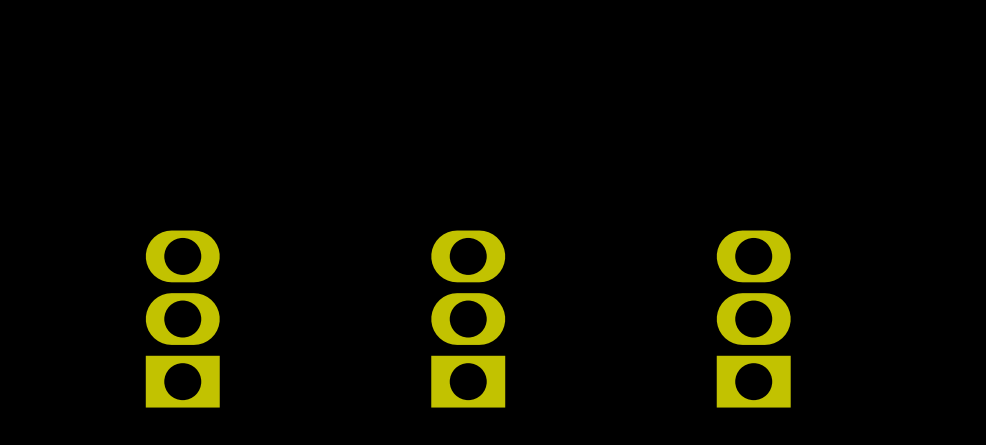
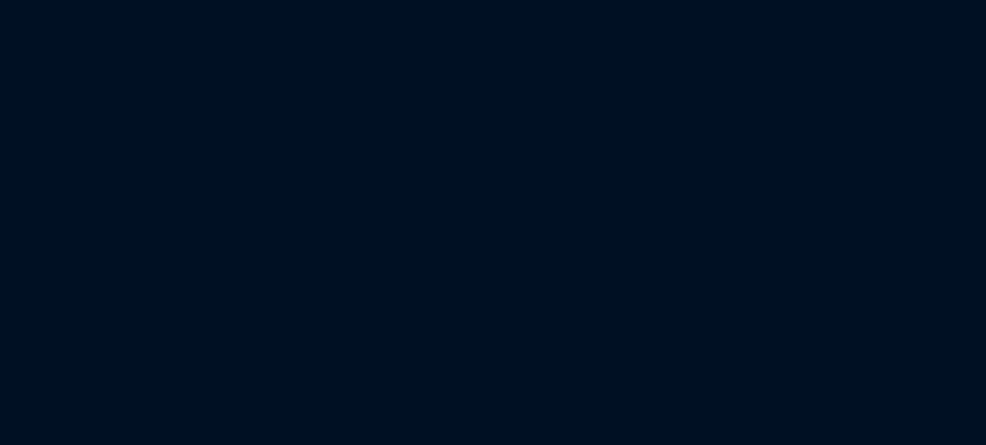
part: (182, 319) -> none
part: (468, 319) -> none
part: (753, 319) -> none

